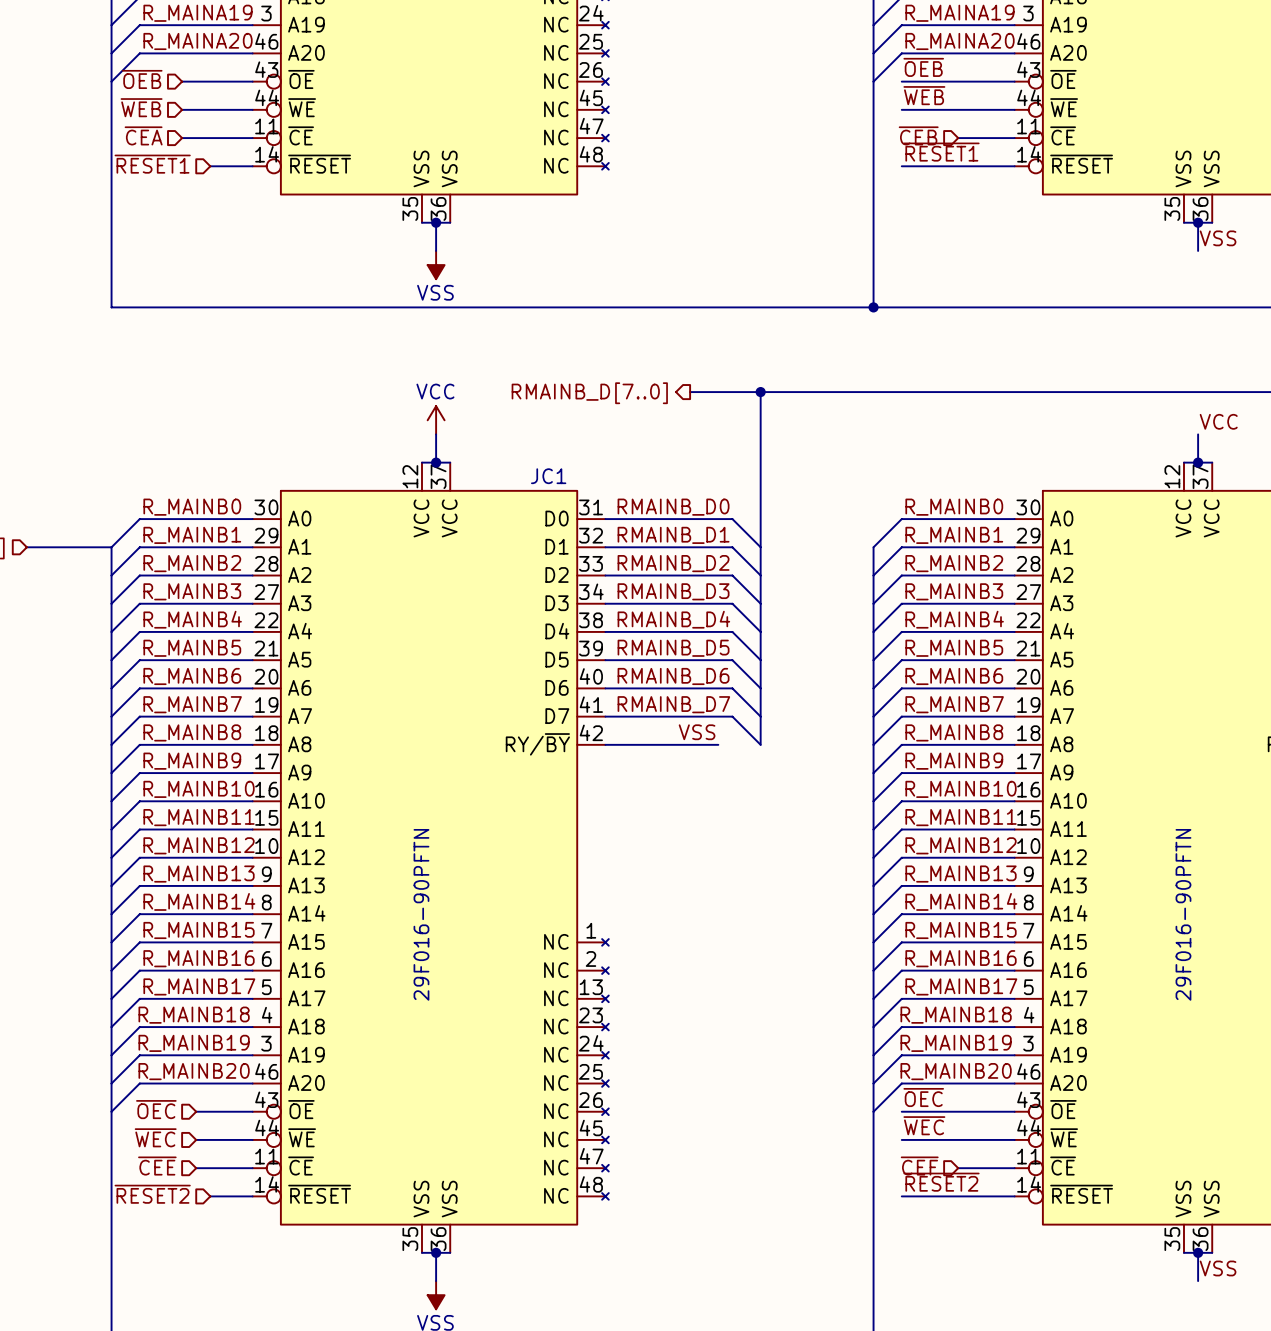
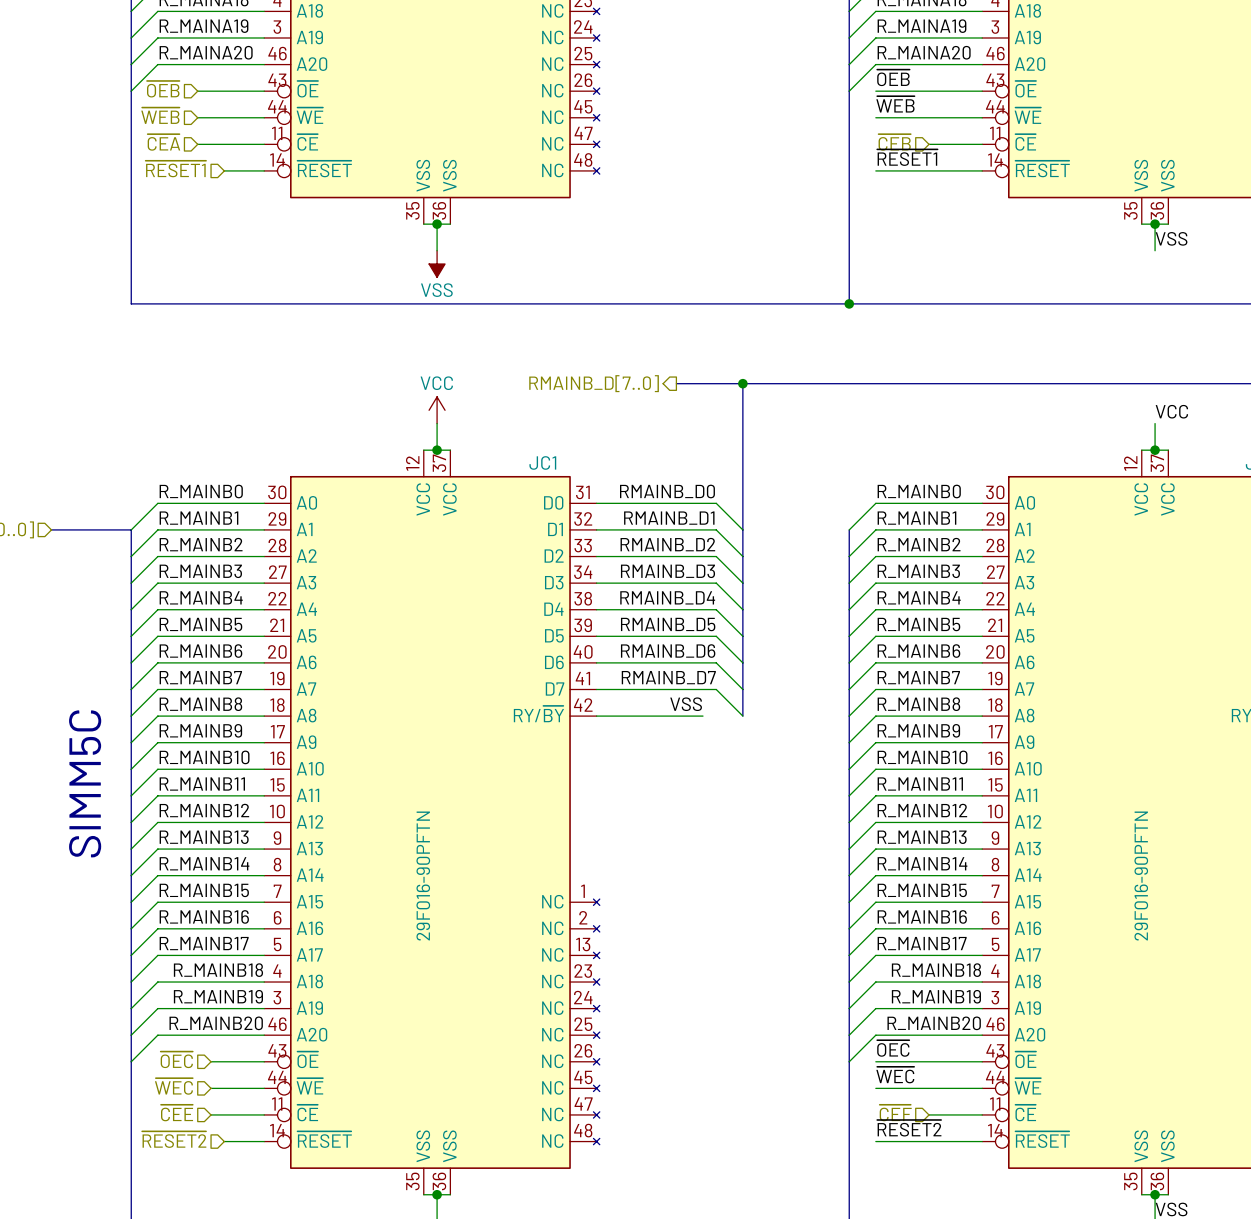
text: none -> SIMM5C (85, 783)

